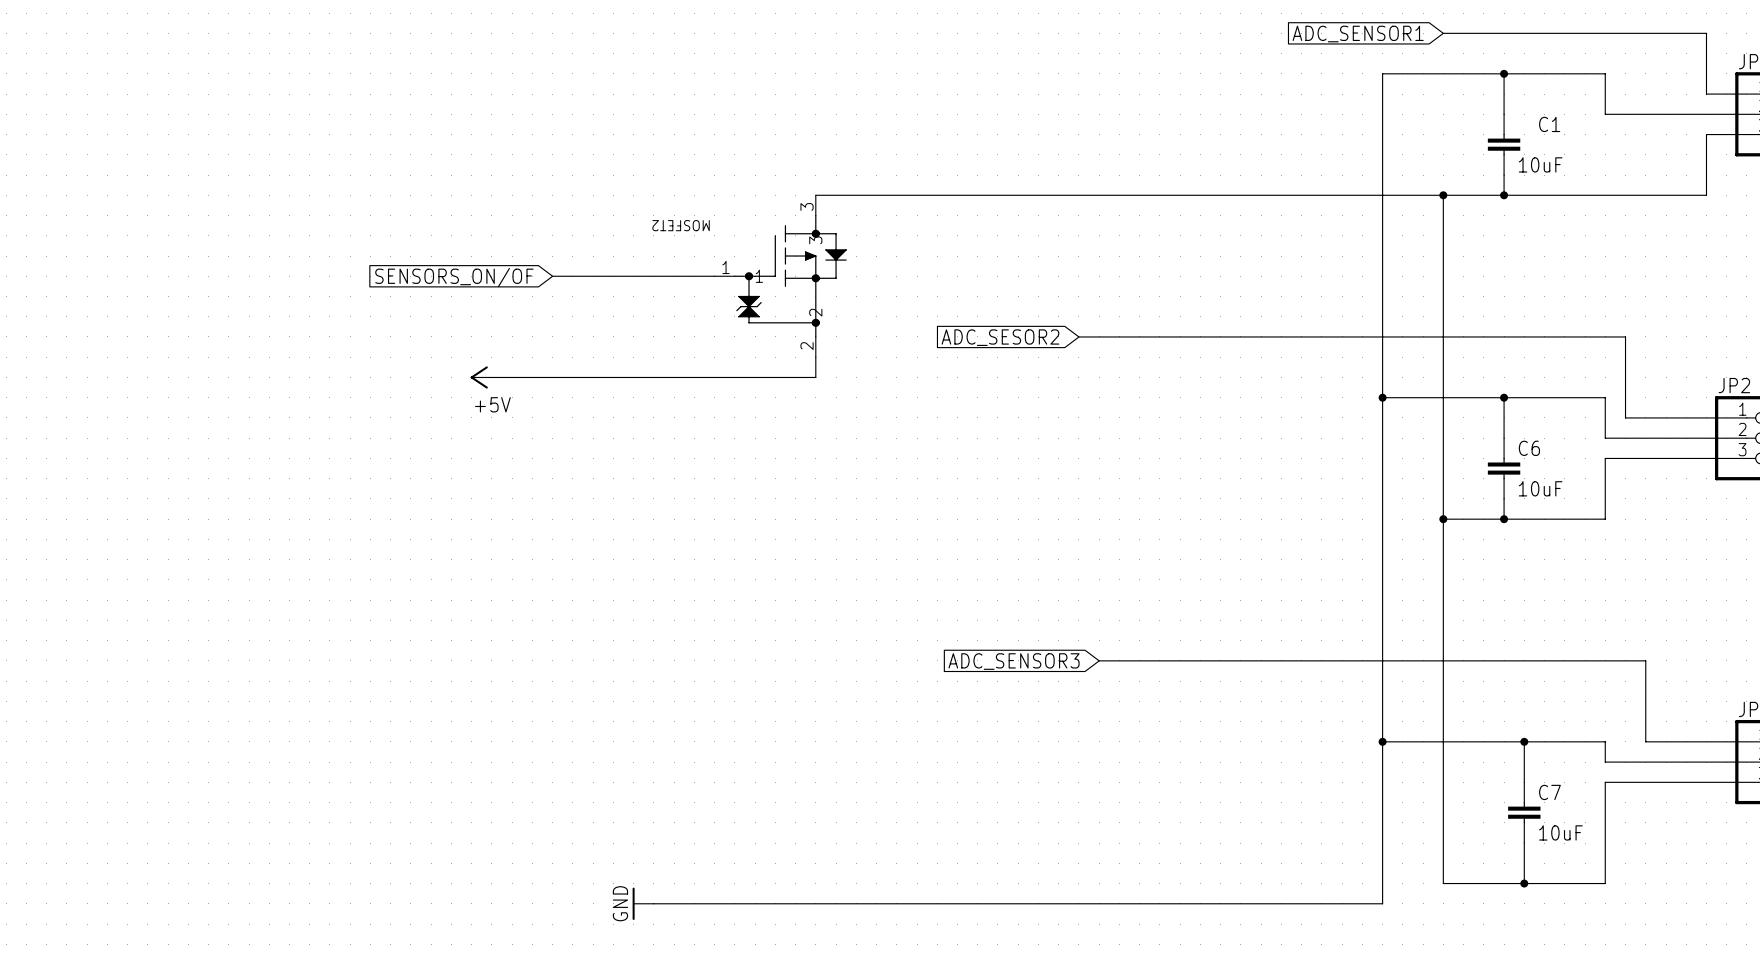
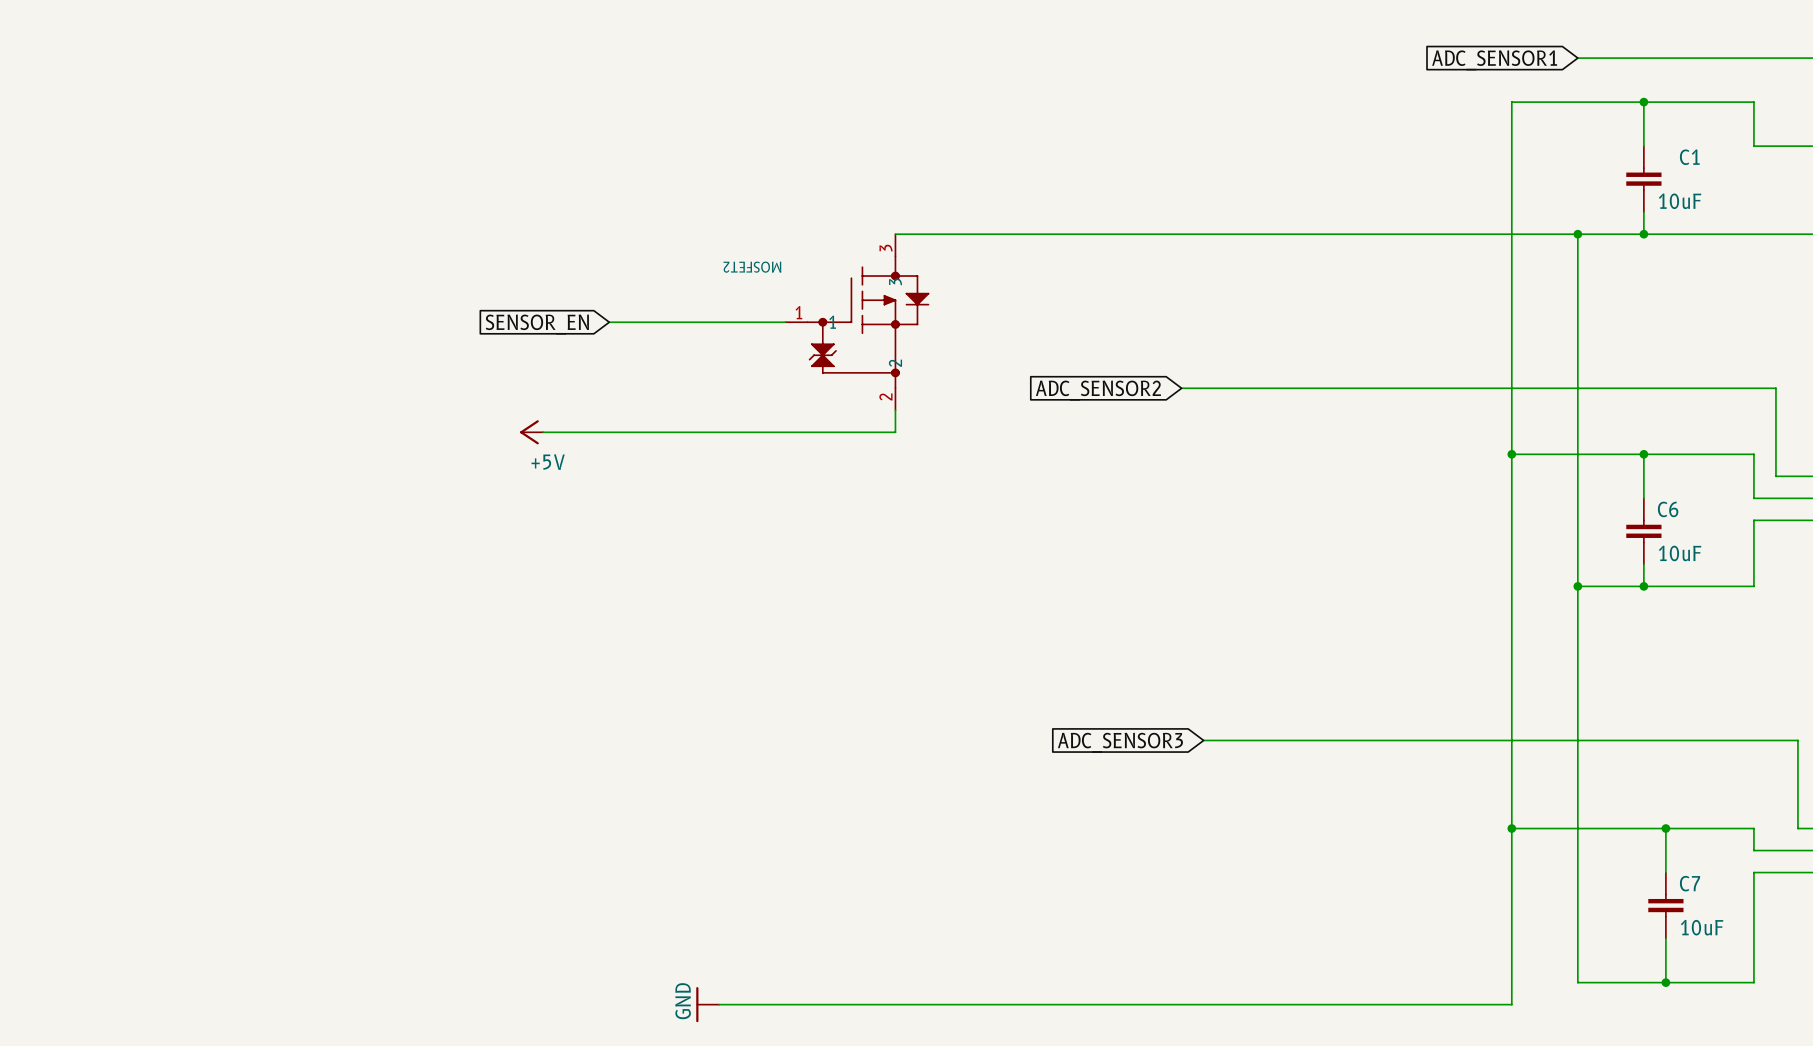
global label: SENSORS_ON/OF (454, 277) -> SENSOR_EN (537, 324)
global label: ADC_SESOR2 (1000, 337) -> ADC_SENSOR2 (1098, 390)

